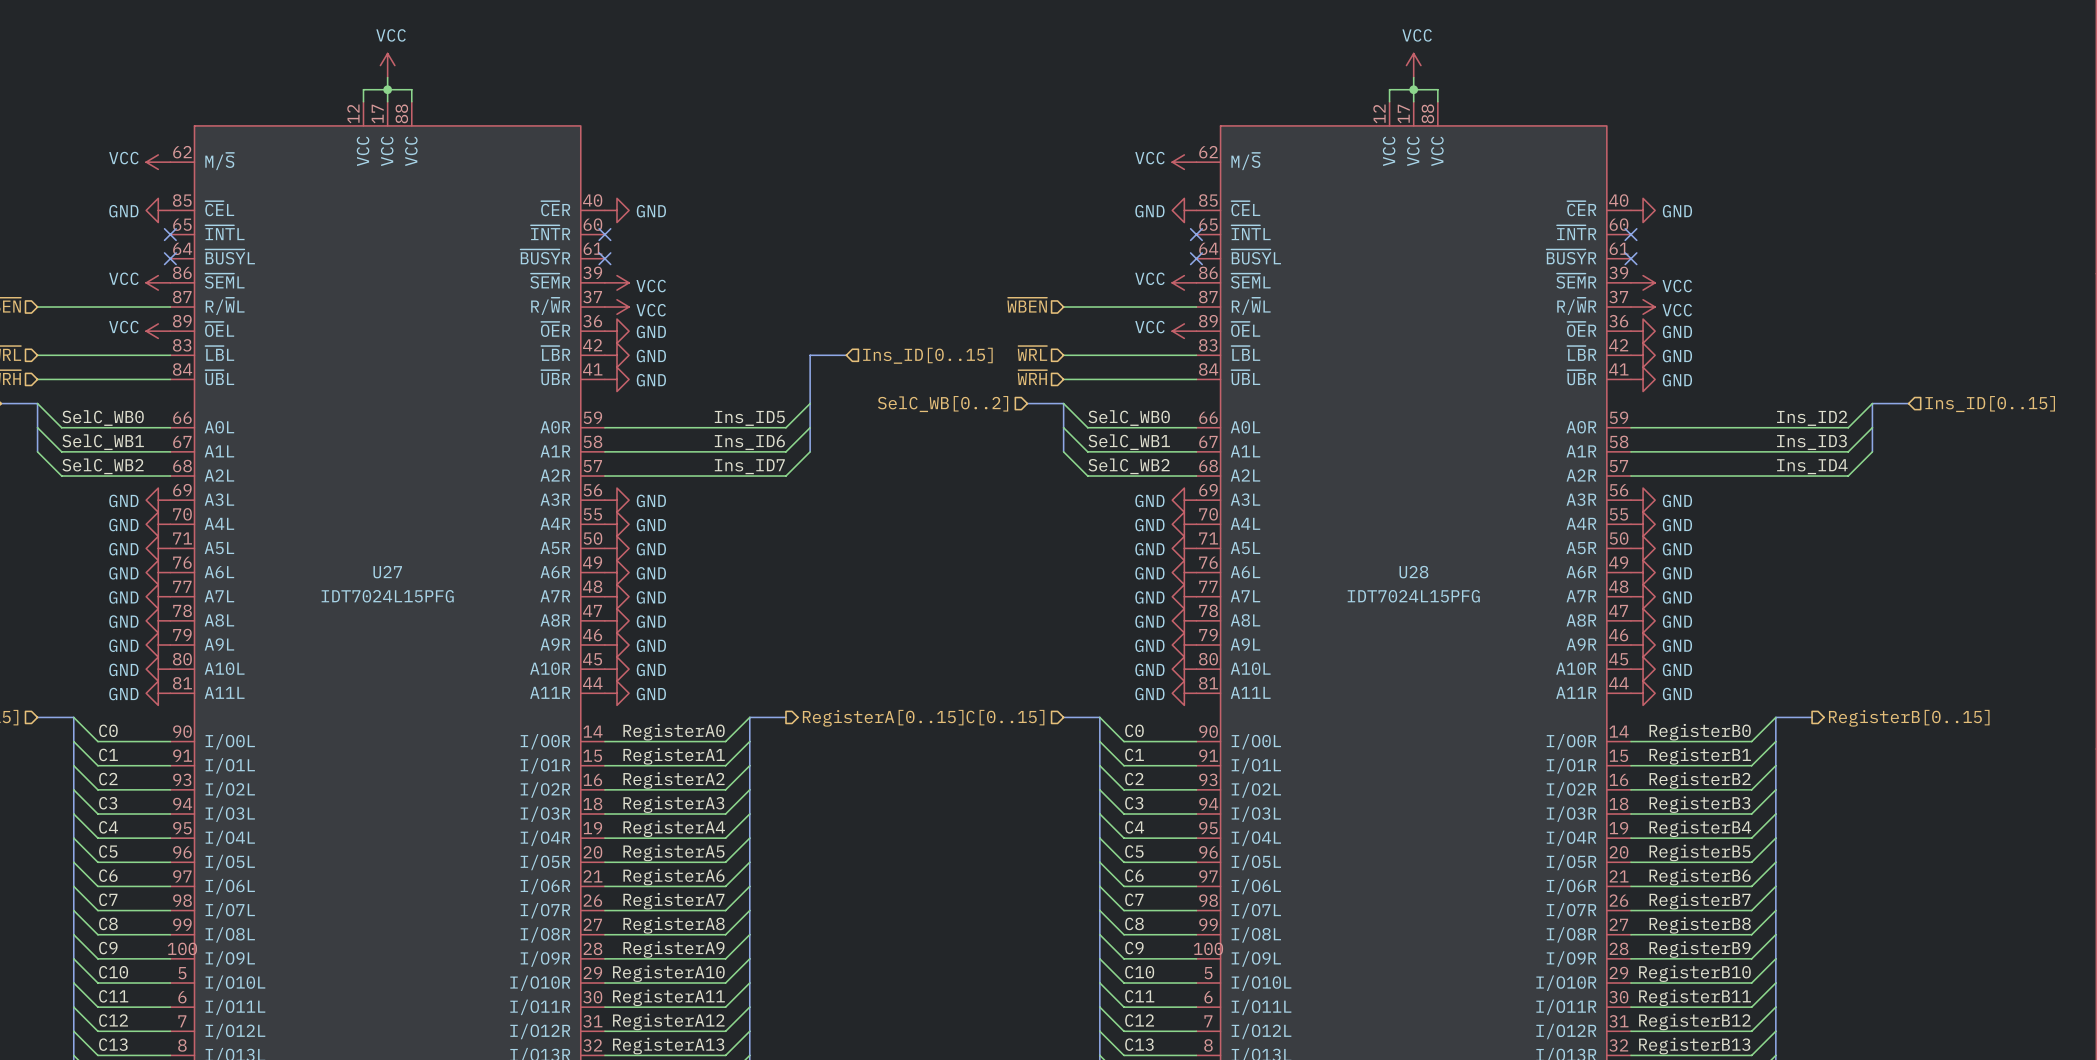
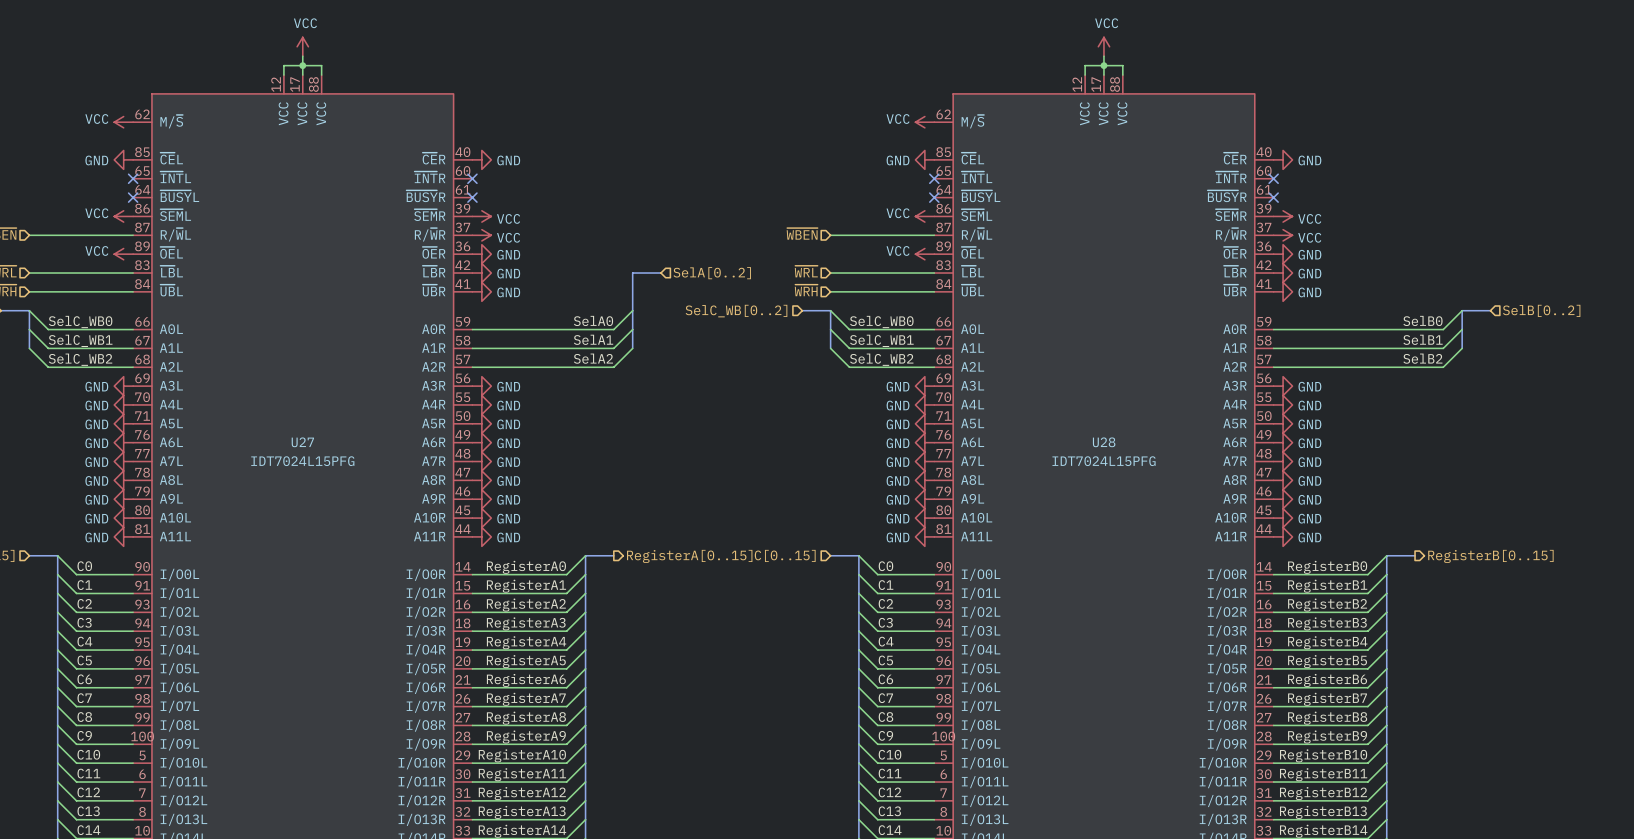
hierarchical label: Ins_ID[0..15] (927, 355) -> SelA[0..2] (712, 273)
hierarchical label: Ins_ID[0..15] (1990, 404) -> SelB[0..2] (1541, 310)
label: Ins_ID5 (749, 418) -> SelA0 (593, 320)
label: Ins_ID2 (1812, 418) -> SelB0 (1422, 320)
label: Ins_ID6 (749, 442) -> SelA1 (593, 339)
label: Ins_ID3 (1811, 442) -> SelB1 (1423, 339)
label: Ins_ID7 (749, 466) -> SelA2 (593, 358)
label: Ins_ID4 (1812, 466) -> SelB2 (1422, 358)

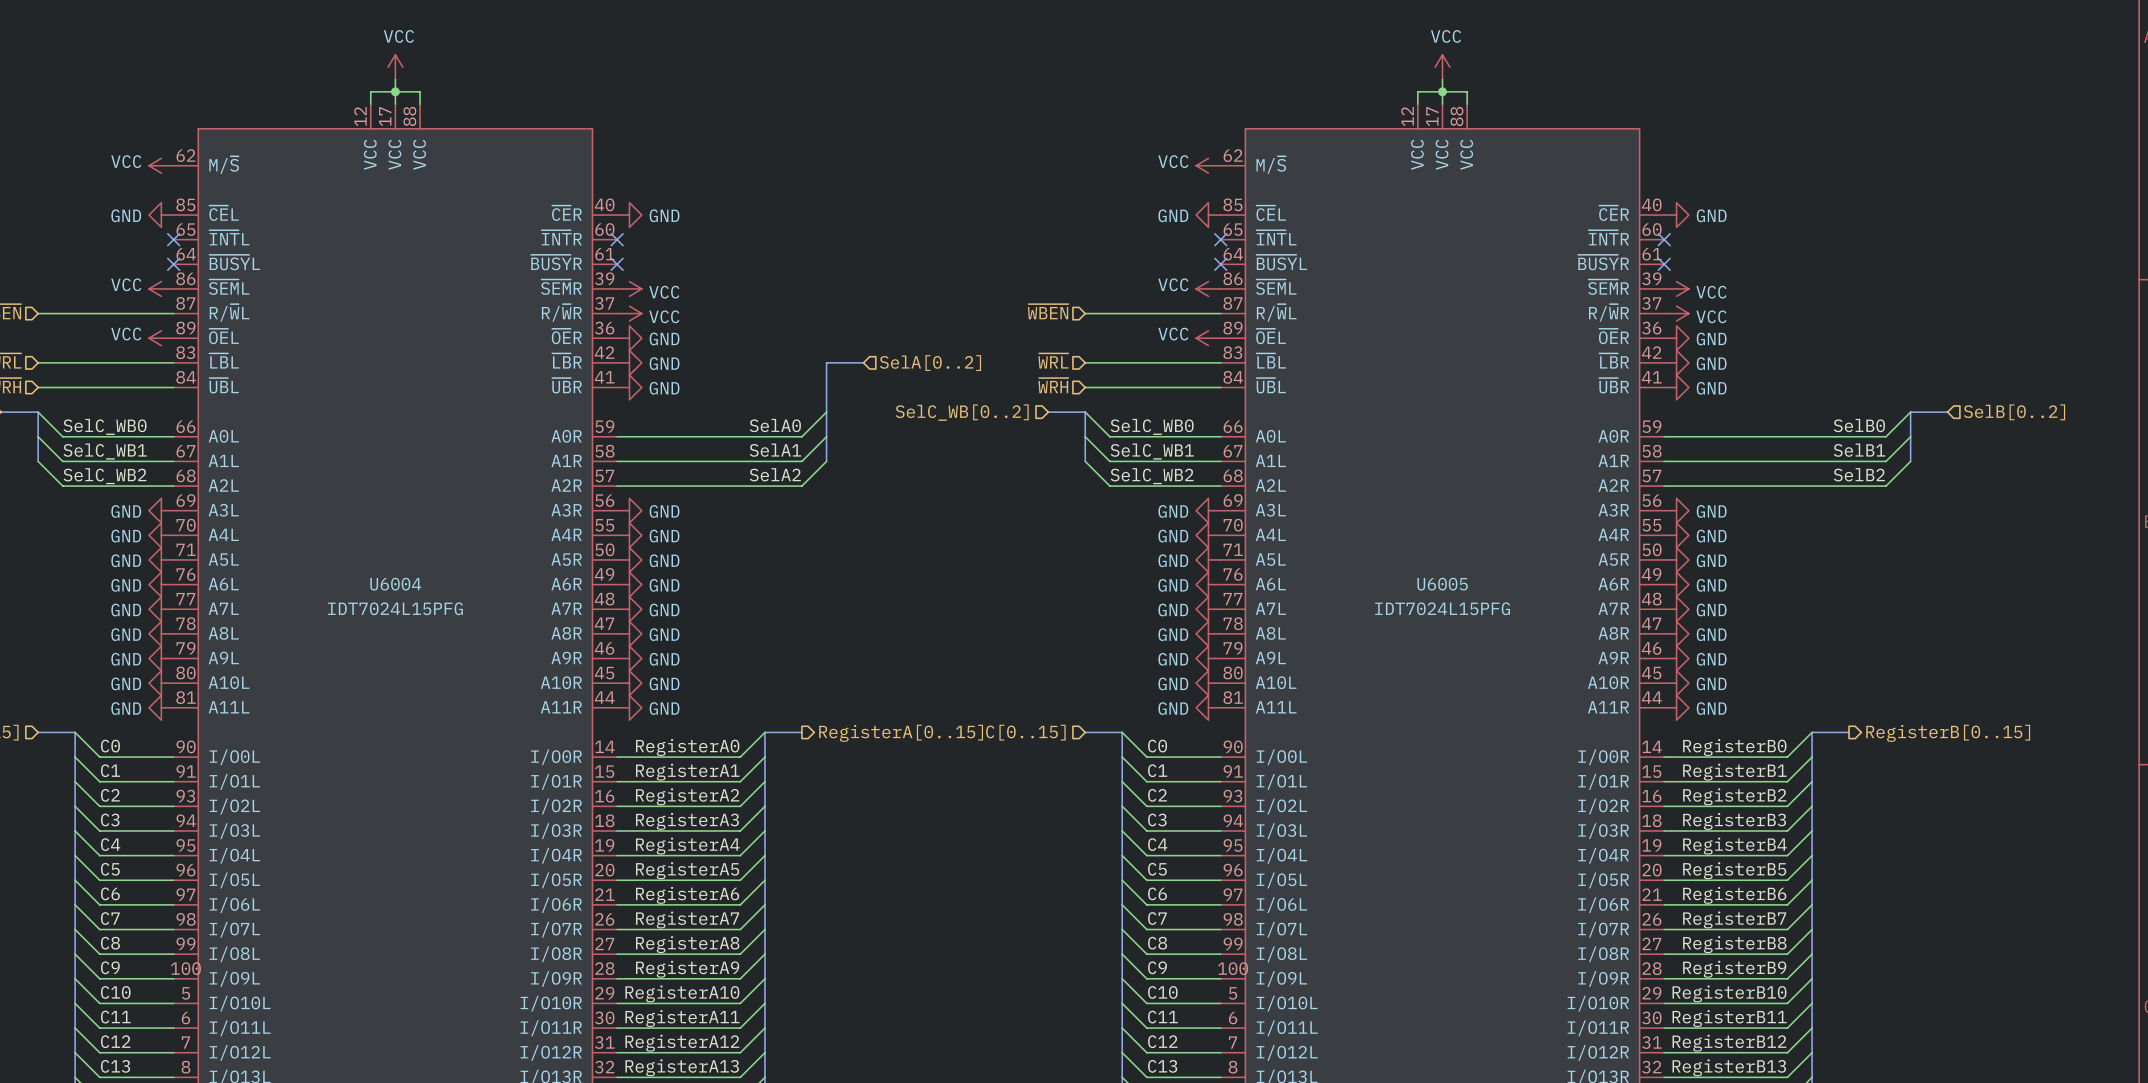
U27 name: U27 (302, 442) -> U6004 (395, 584)
U28 name: U28 (1104, 442) -> U6005 (1442, 584)

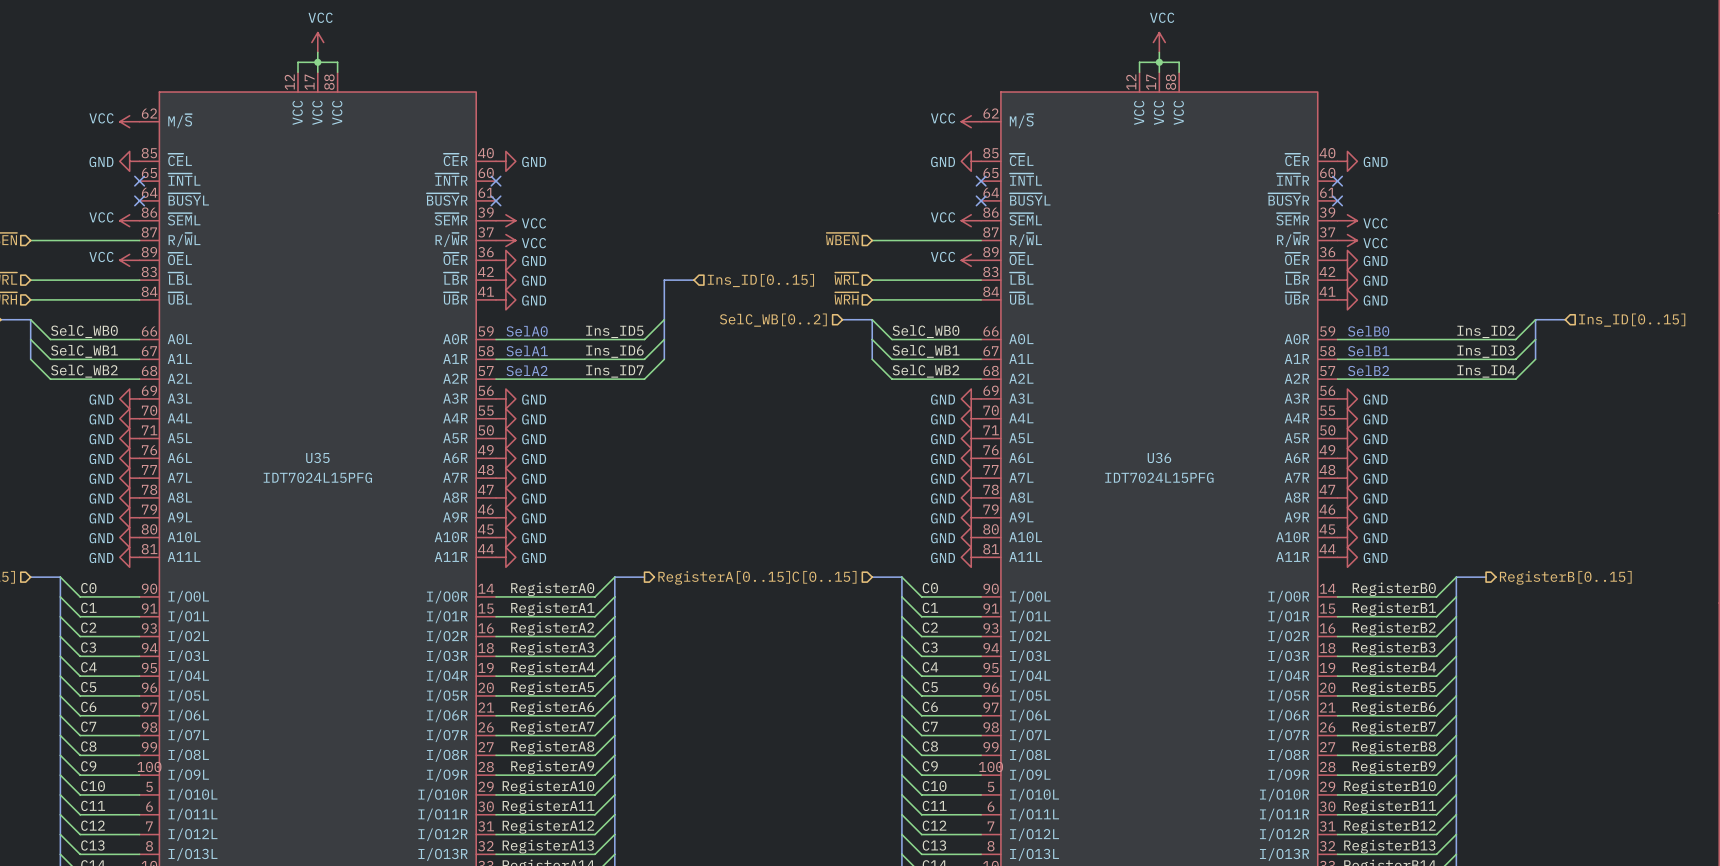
hierarchical label: SelA[0..2] (930, 363) -> Ins_ID[0..15] (760, 280)
hierarchical label: SelB[0..2] (2014, 412) -> Ins_ID[0..15] (1632, 320)
label: SelA0 (775, 425) -> Ins_ID5 (614, 331)
label: SelB0 (1859, 425) -> Ins_ID2 (1486, 331)
text: none -> SelA0 (527, 331)
text: none -> SelB0 (1368, 331)
label: SelA1 (775, 450) -> Ins_ID6 (614, 351)
label: SelB1 (1859, 450) -> Ins_ID3 (1485, 351)
text: none -> SelA1 (527, 351)
text: none -> SelB1 (1368, 351)
label: SelA2 (775, 474) -> Ins_ID7 (614, 371)
label: SelB2 (1859, 474) -> Ins_ID4 (1486, 371)
text: none -> SelA2 (527, 370)
text: none -> SelB2 (1368, 370)
U6004 name: U6004 (395, 584) -> U35 (317, 457)
U6005 name: U6005 (1442, 584) -> U36 (1159, 457)

